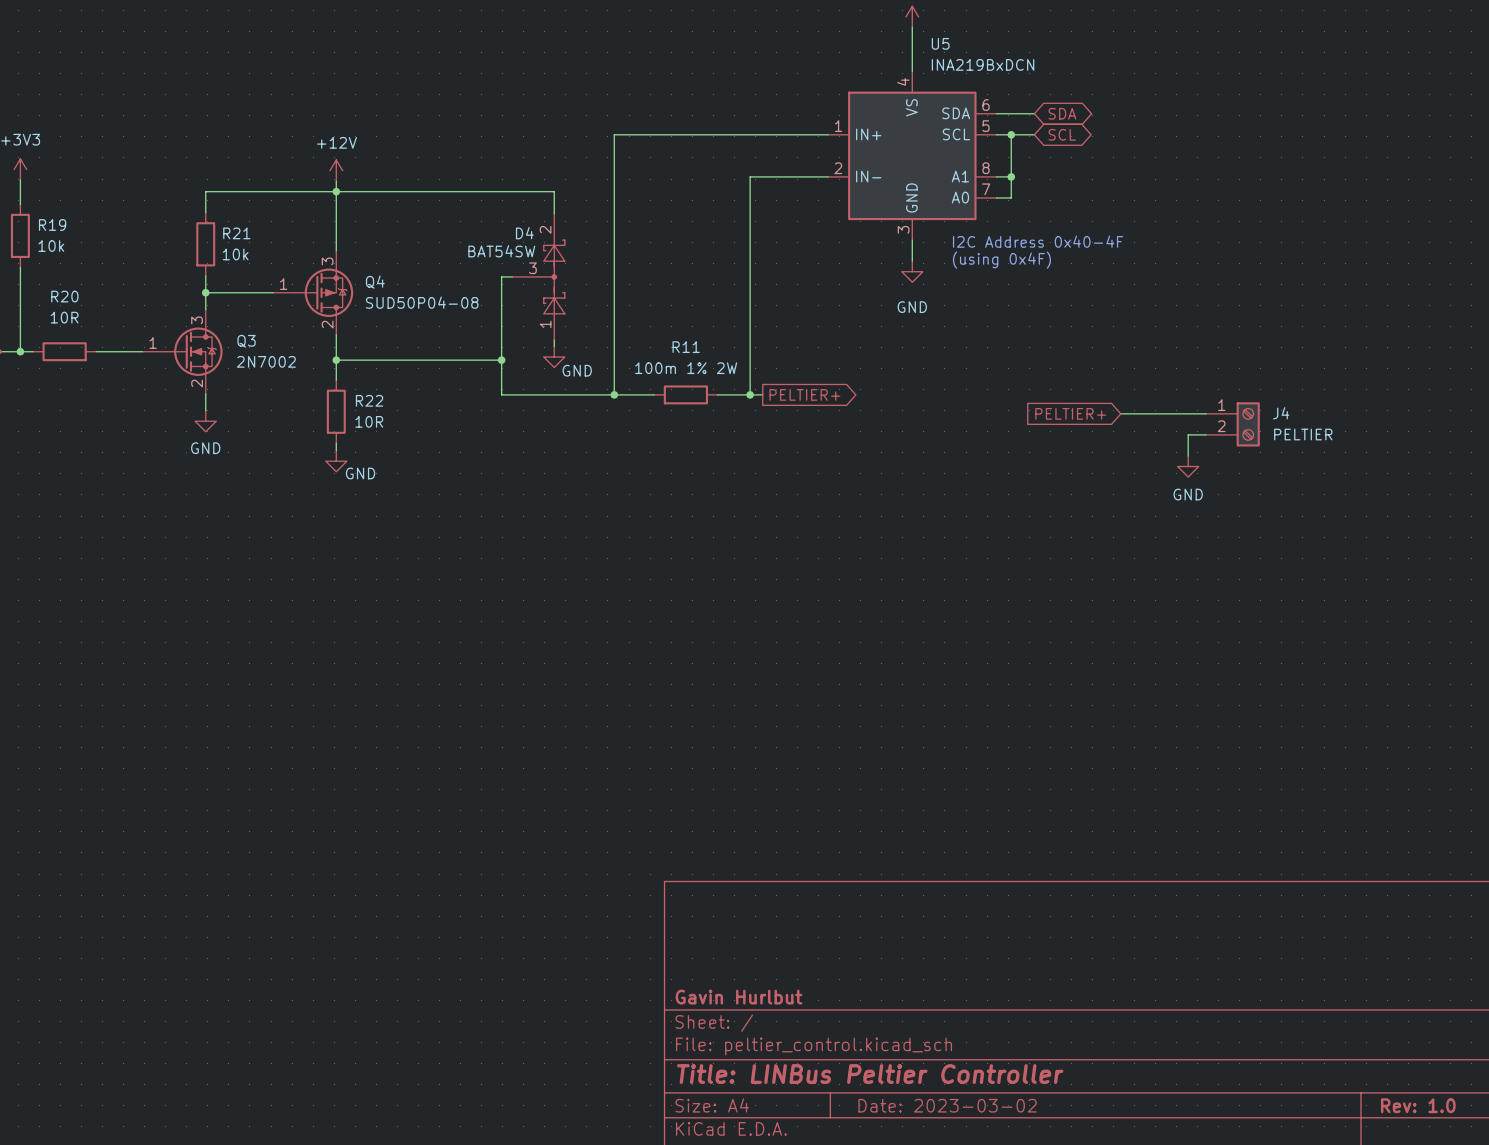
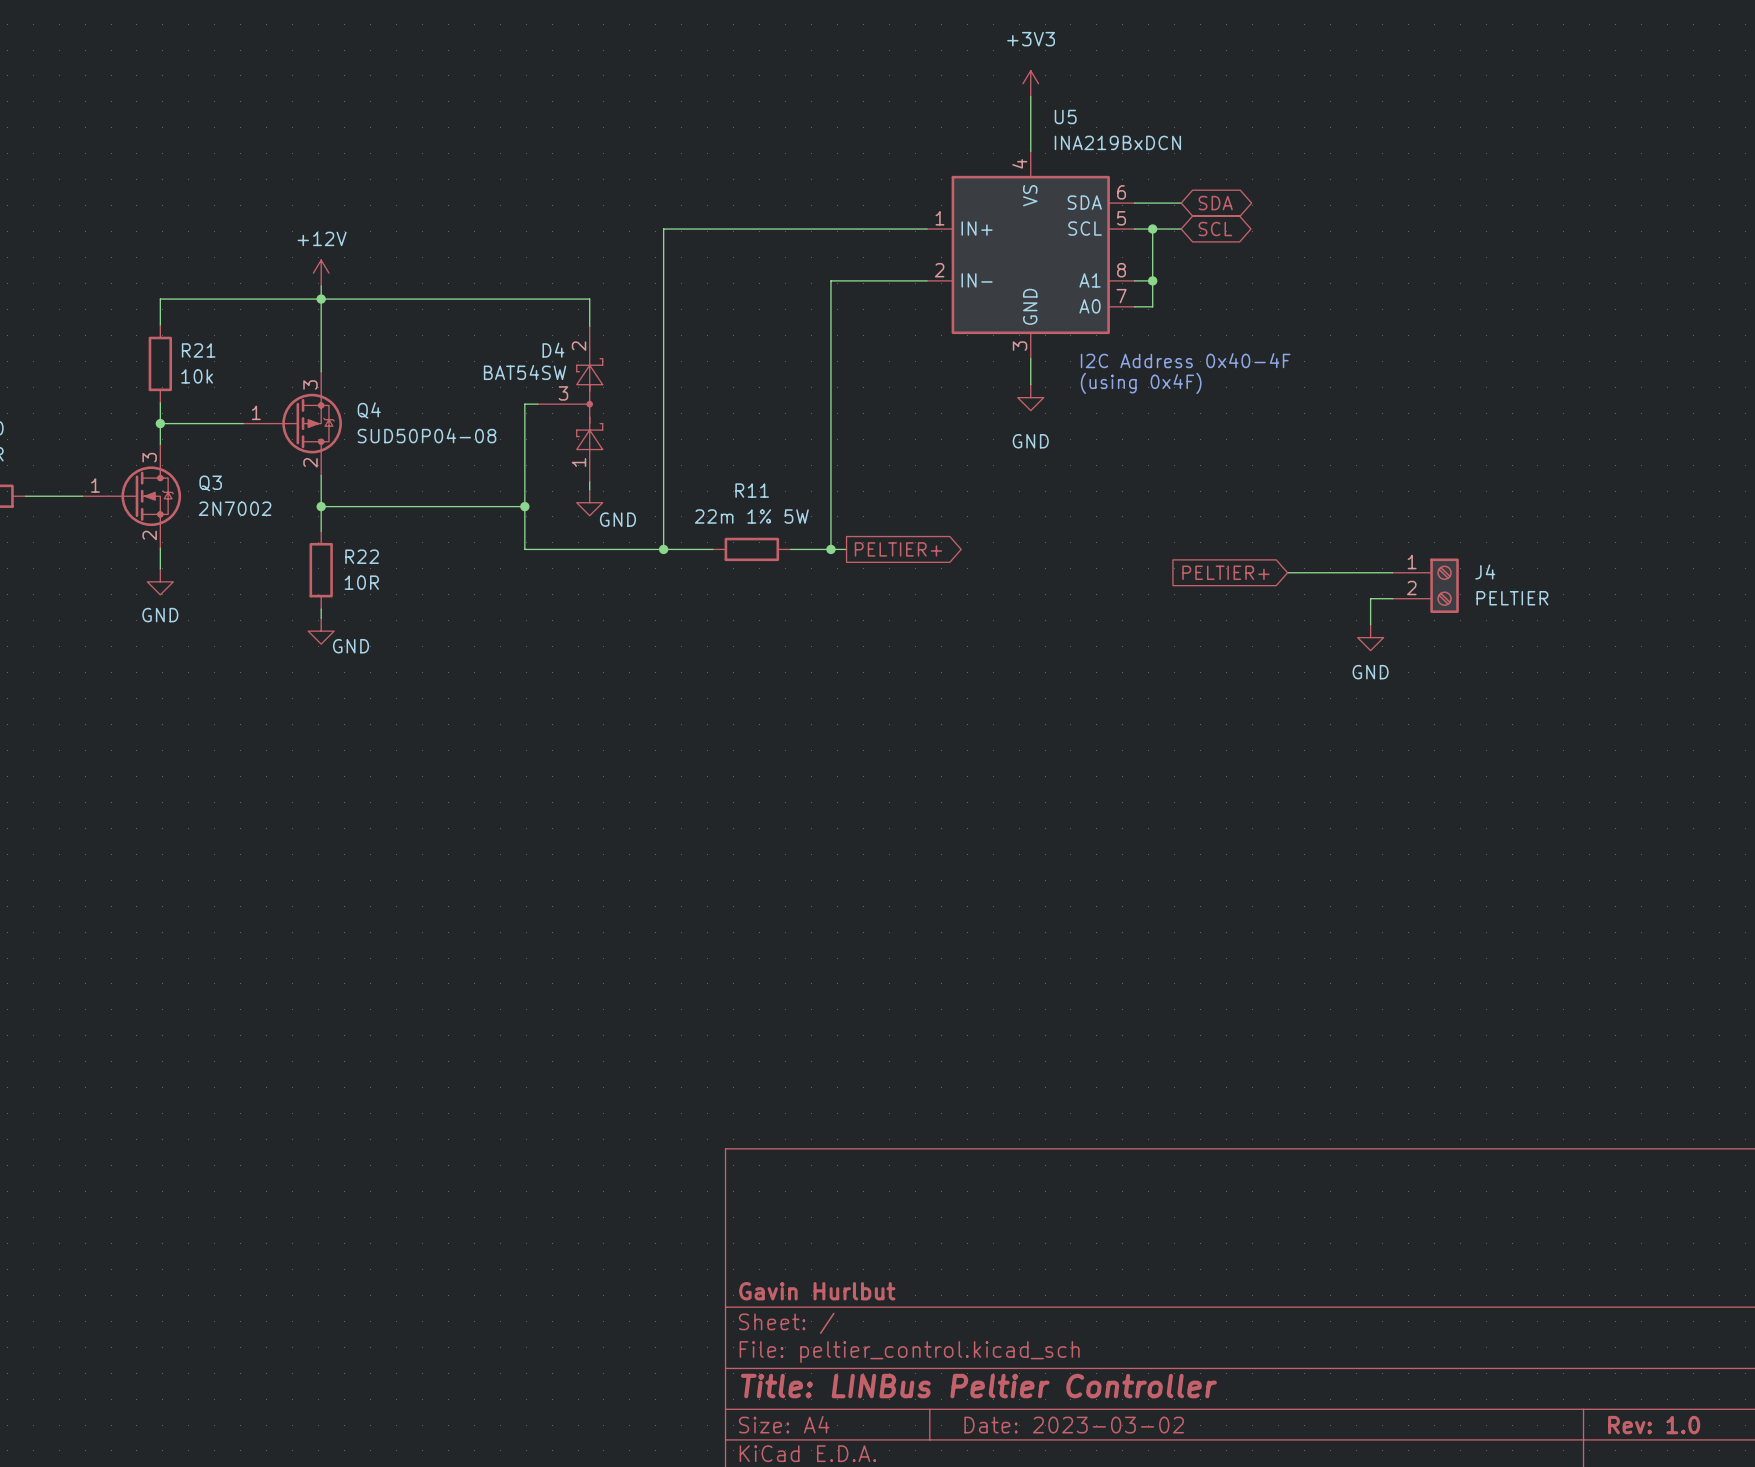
R11 value: 100m 1% 2W (686, 368) -> 22m 1% 5W (751, 516)

